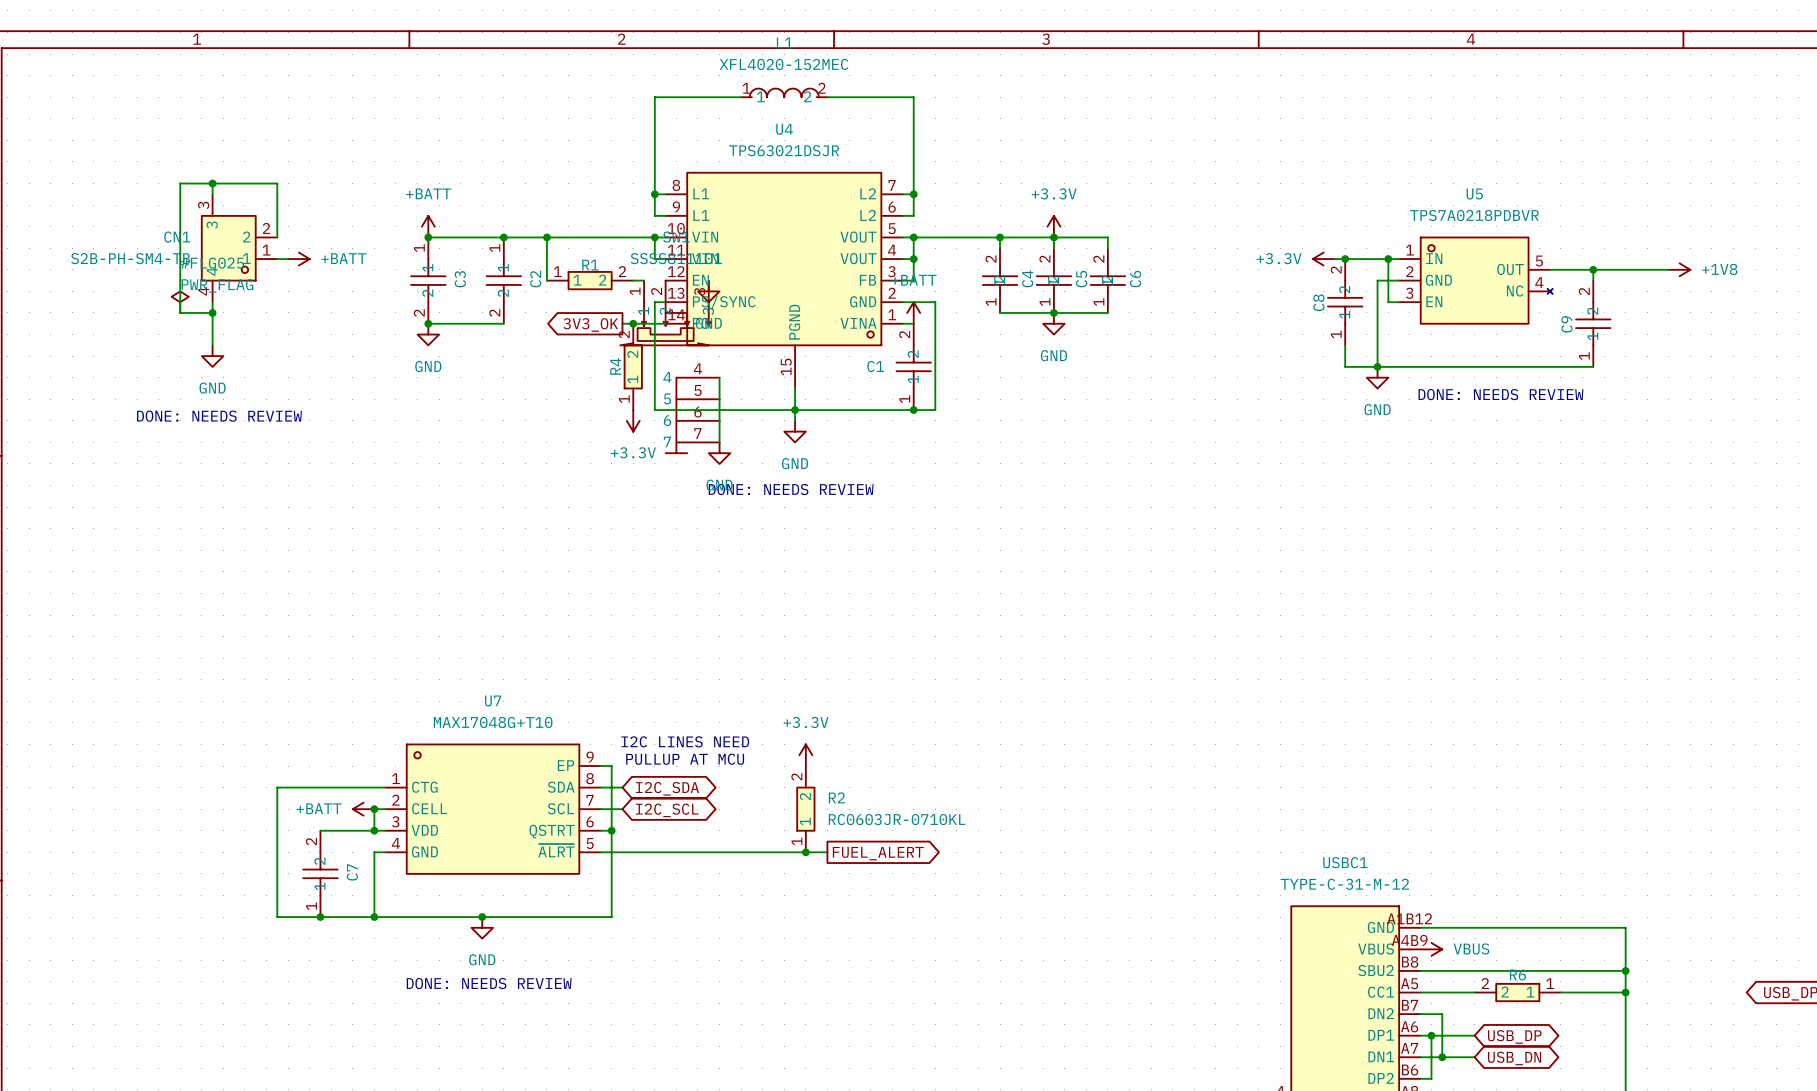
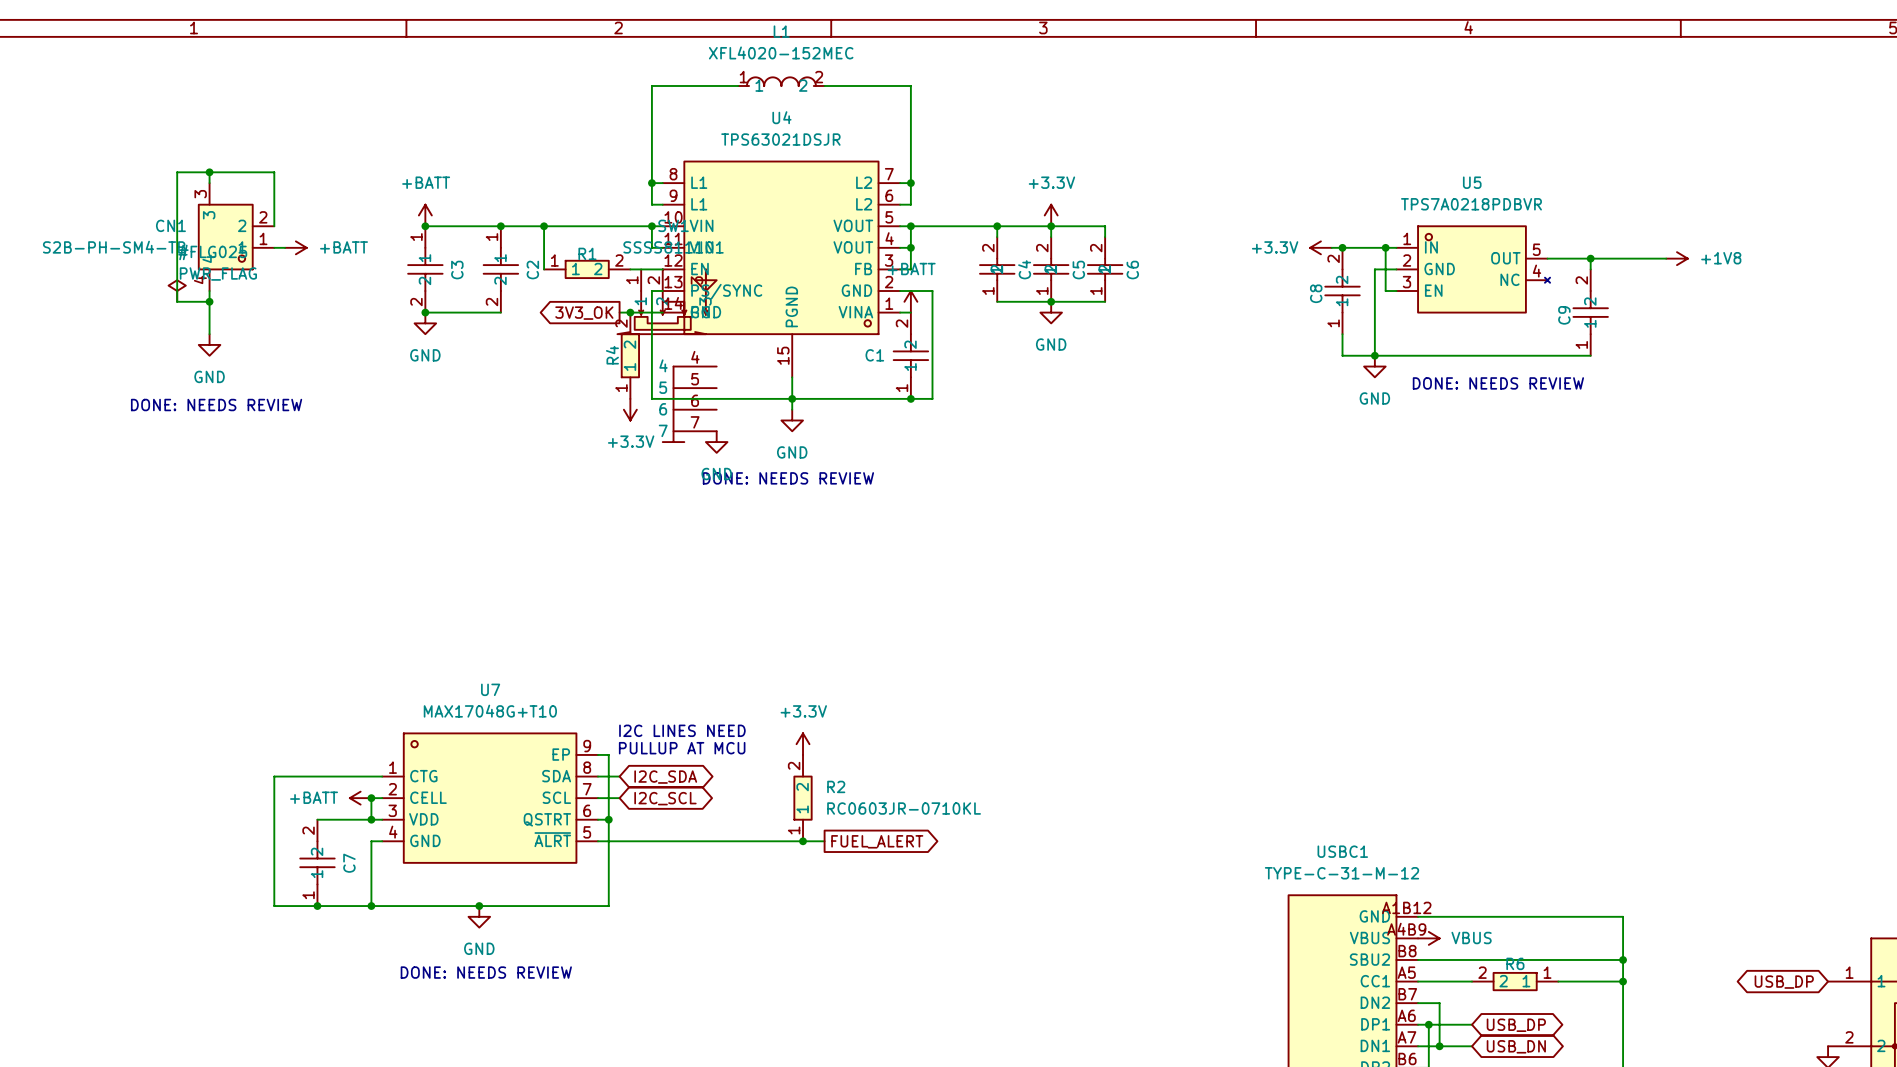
wire: none -> (641, 269) (662, 269)
wire: (719, 377) (719, 442) -> none

